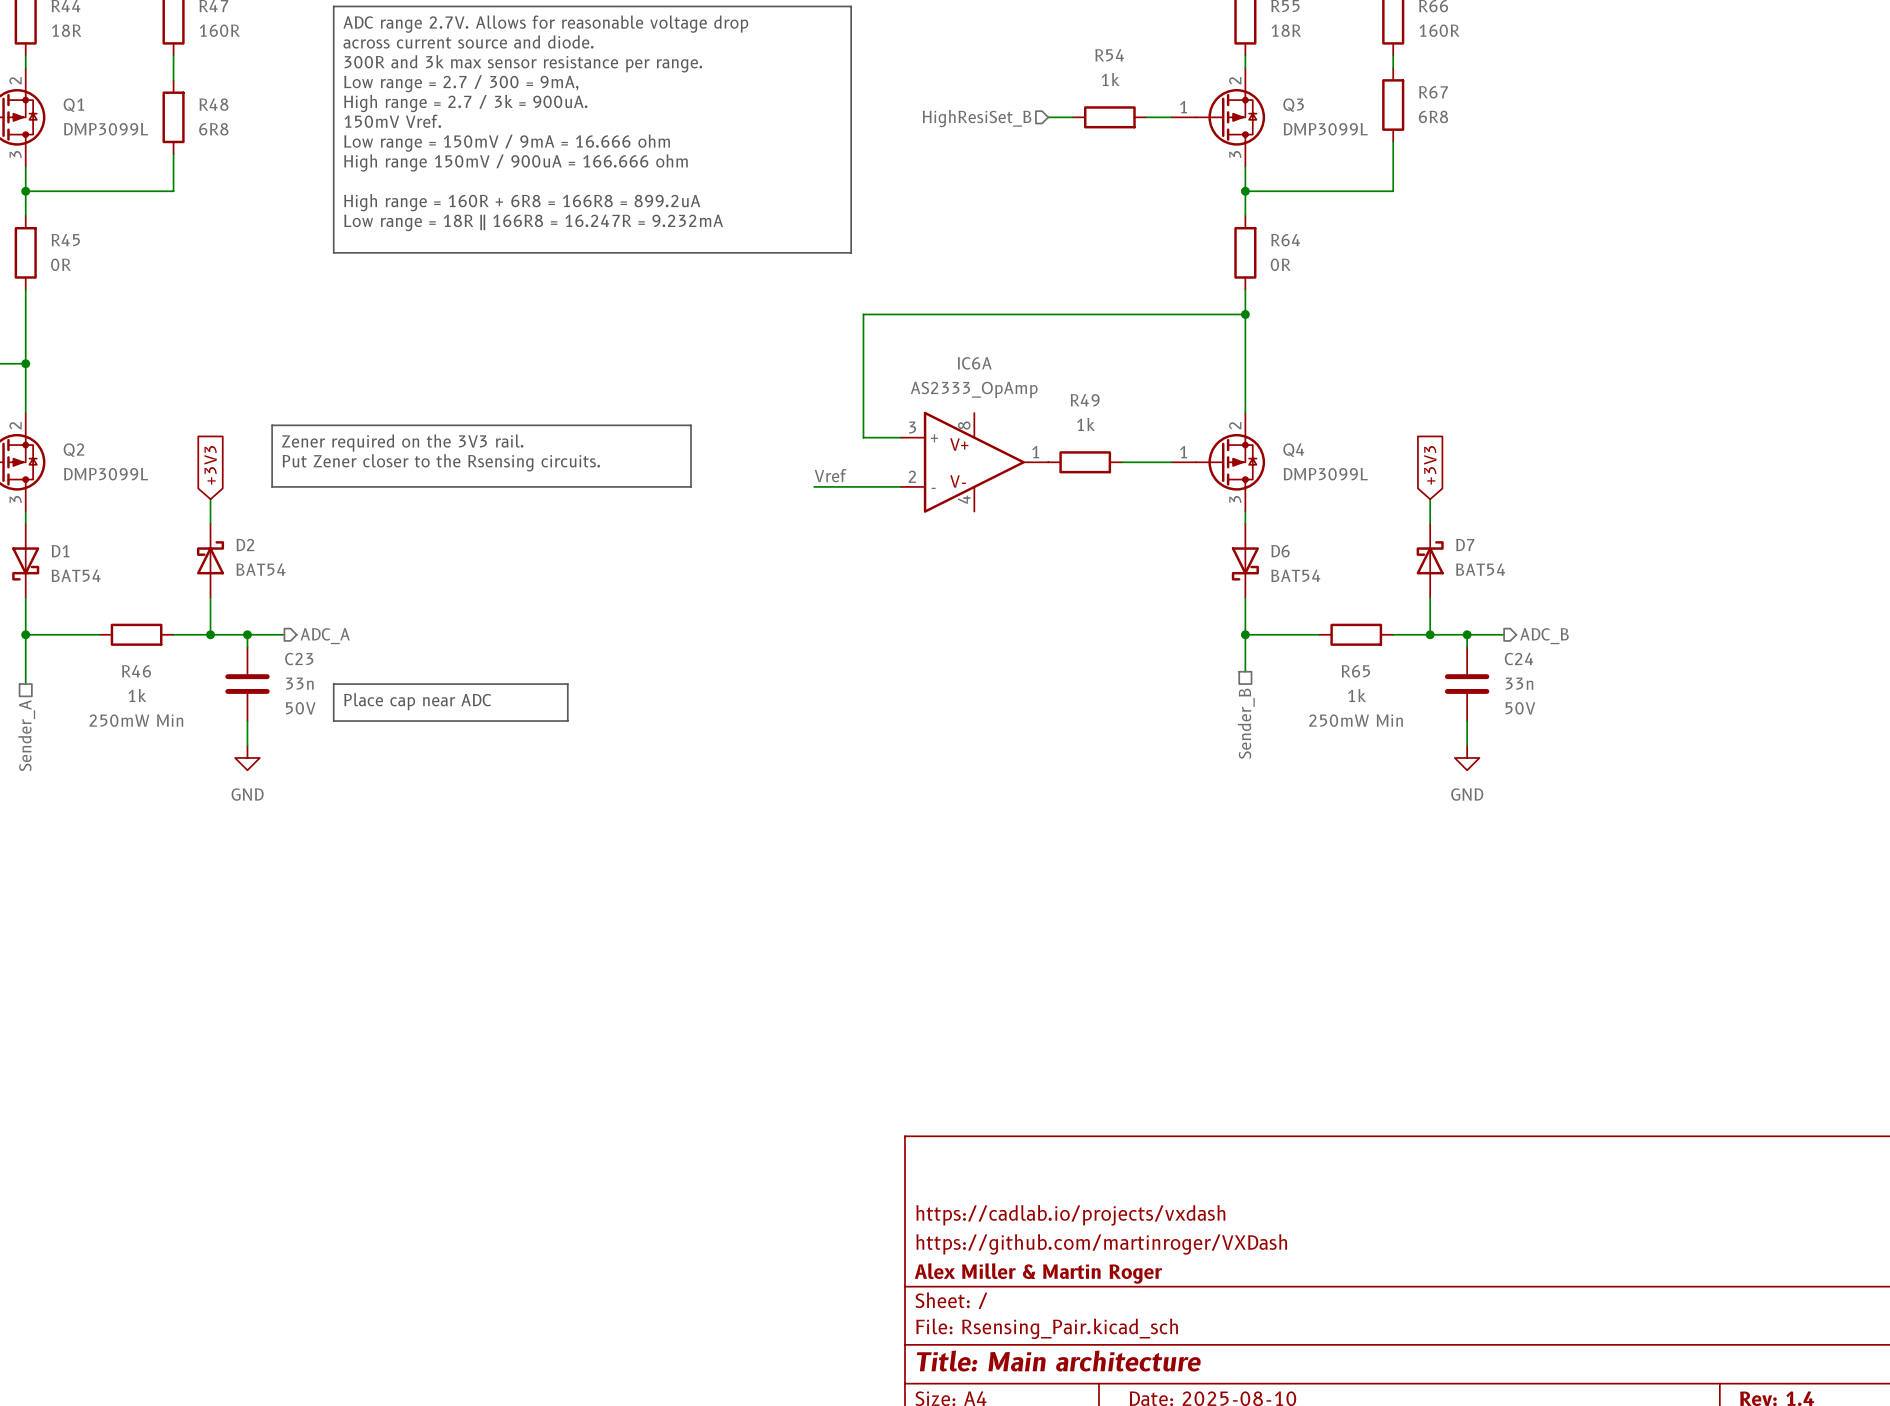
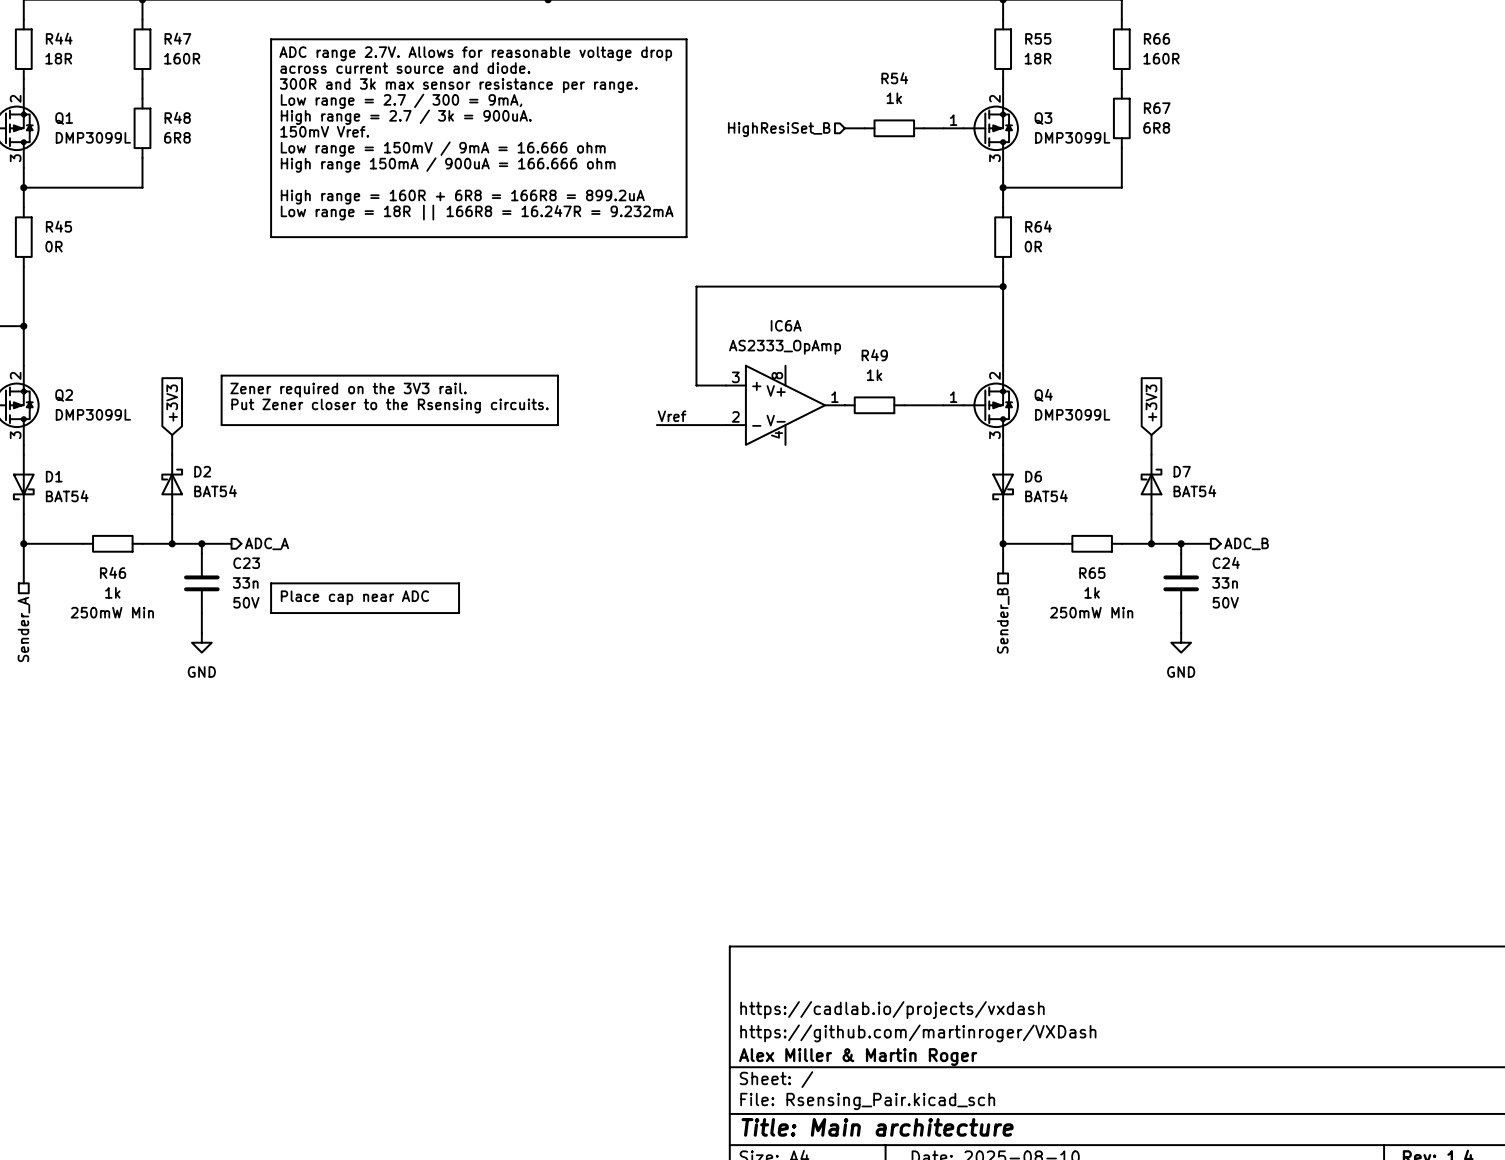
text: High range 150mV / 900uA = 166.666 ohm (515, 162) -> High range 150mA / 900uA = 166.666 ohm (448, 165)

